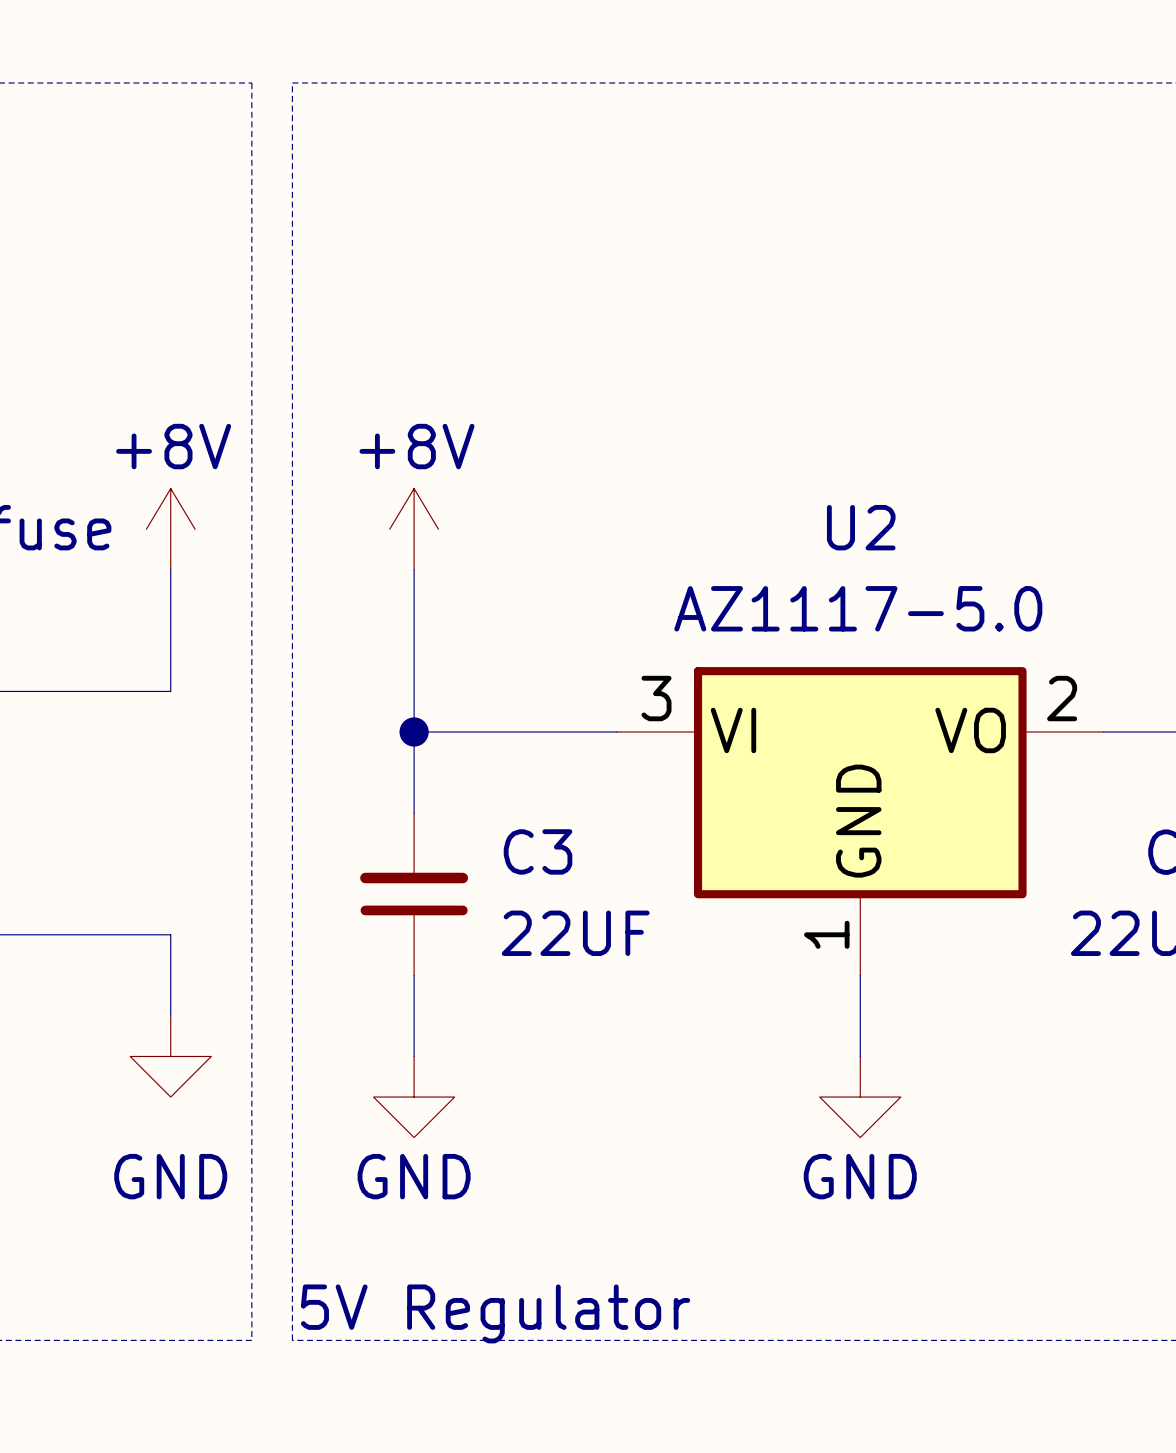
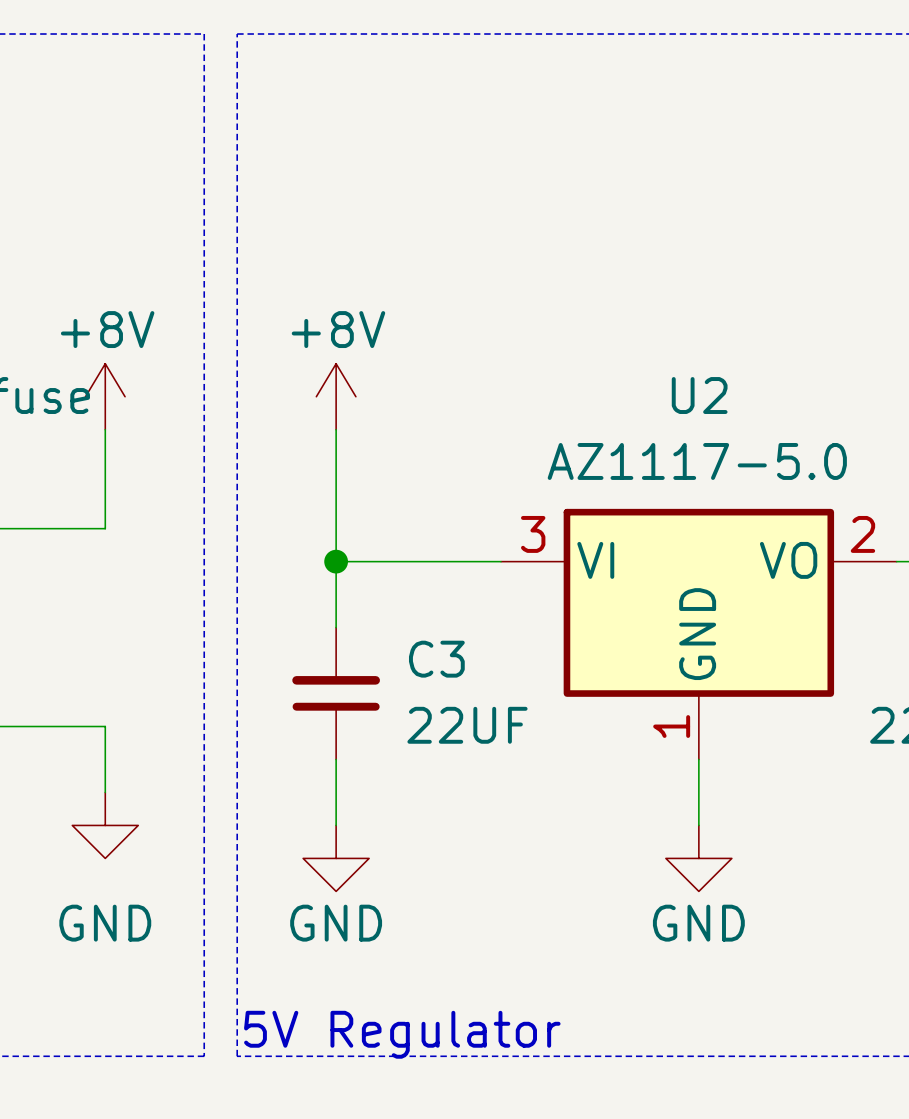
power symbol position: +8V (170, 529) -> +8V (105, 396)
wire: (170, 569) (170, 691) (130, 691) -> (105, 429) (105, 528)
wire: (130, 934) (170, 934) (170, 1015) -> (105, 726) (105, 792)
power symbol position: GND (170, 1056) -> GND (105, 825)

